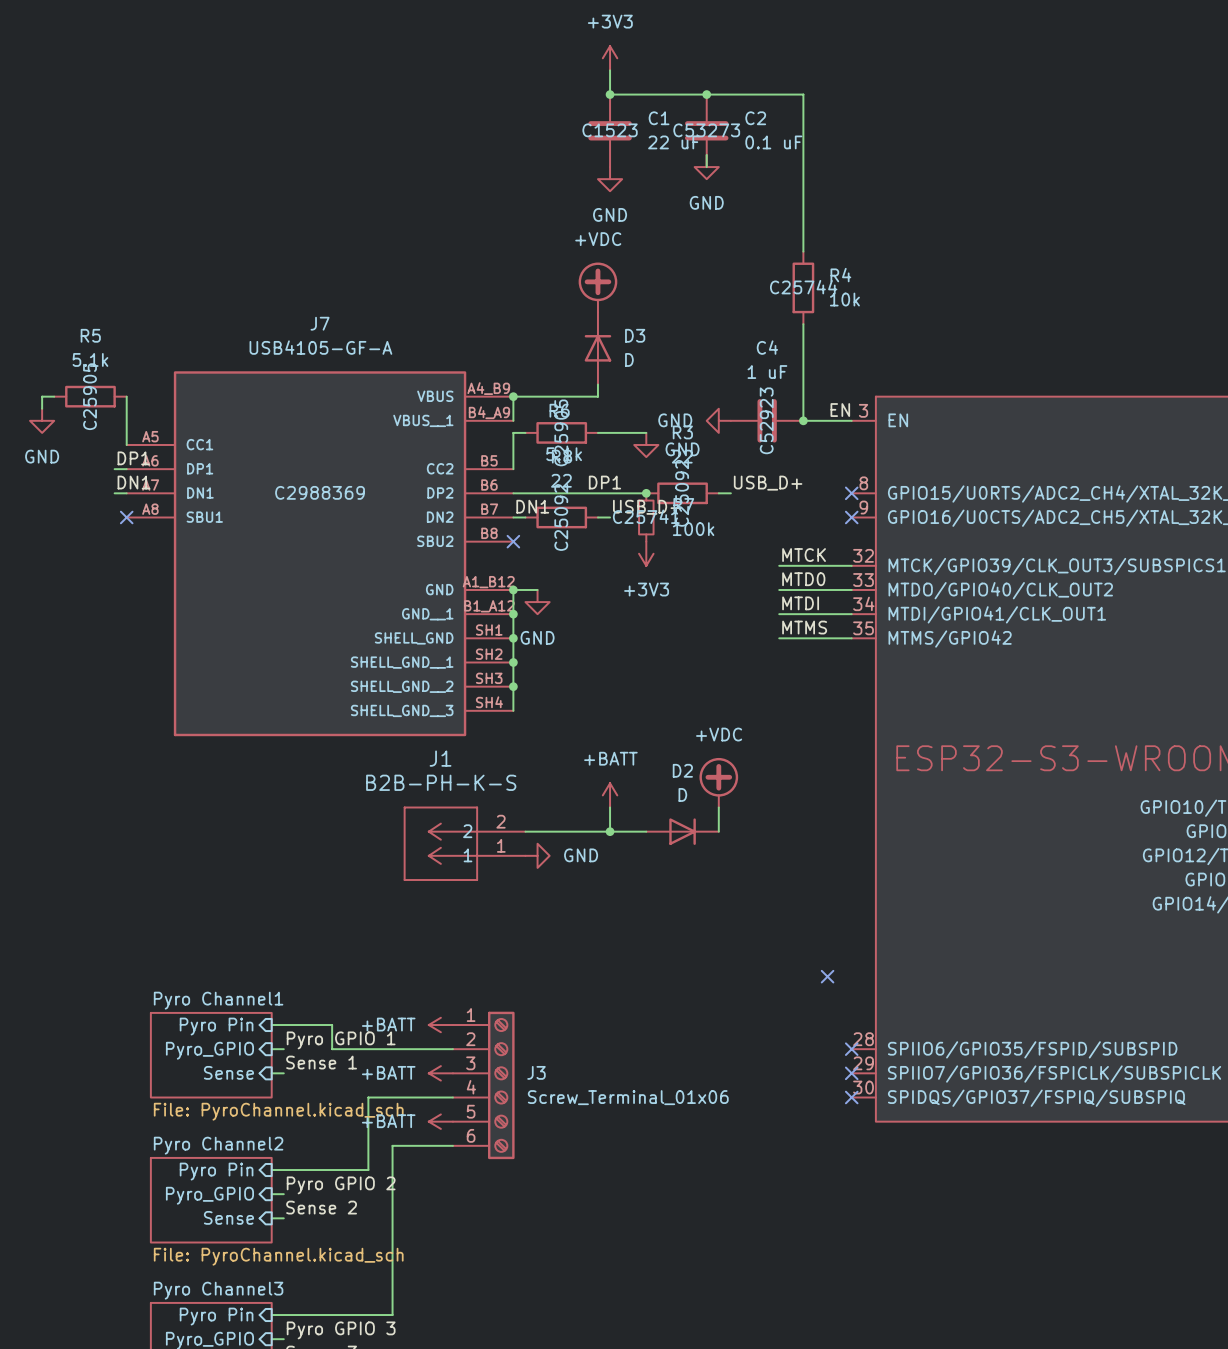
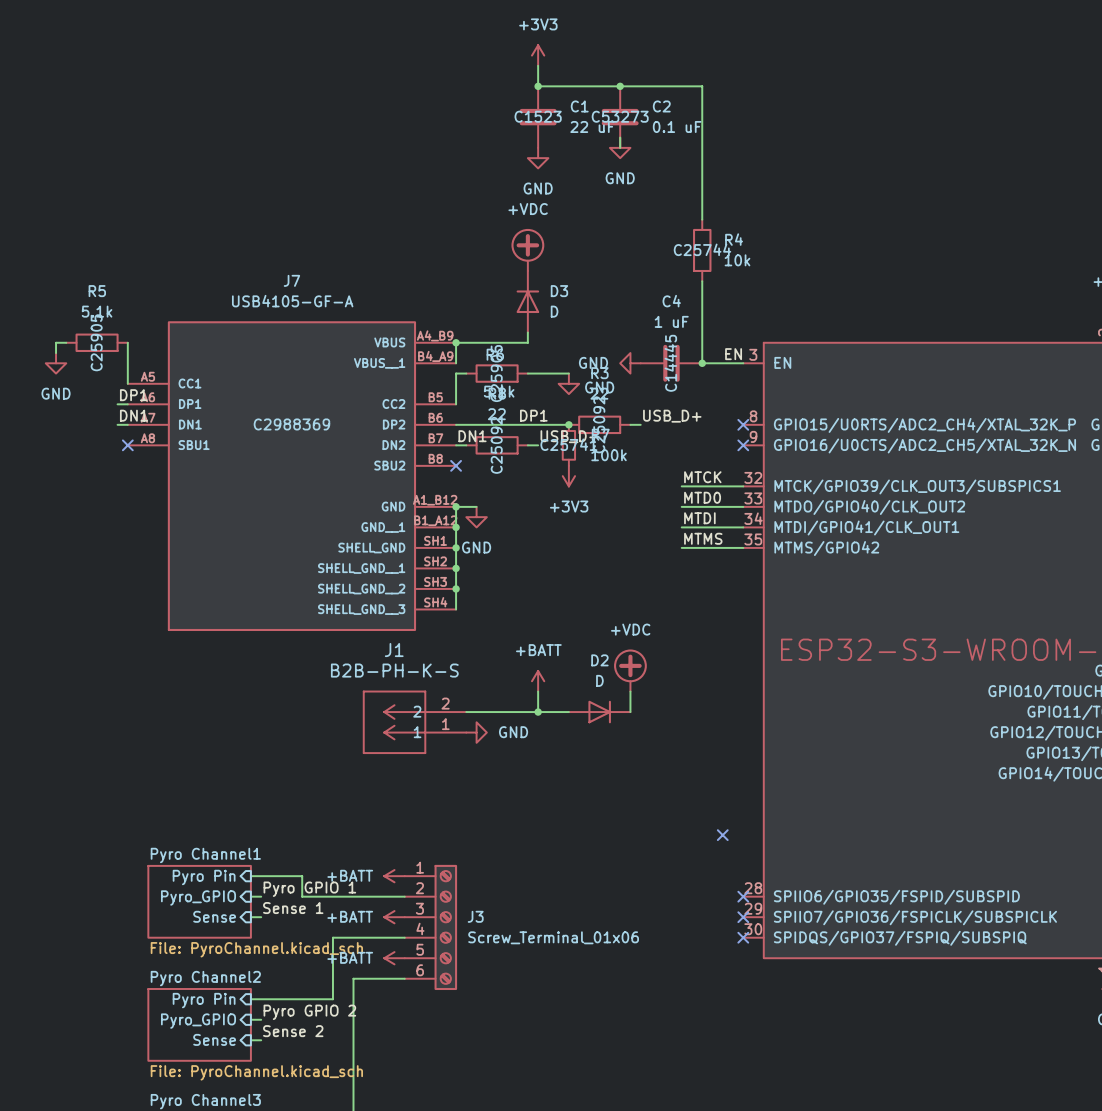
C4 text: C52923 (766, 420) -> C14445 (670, 363)

